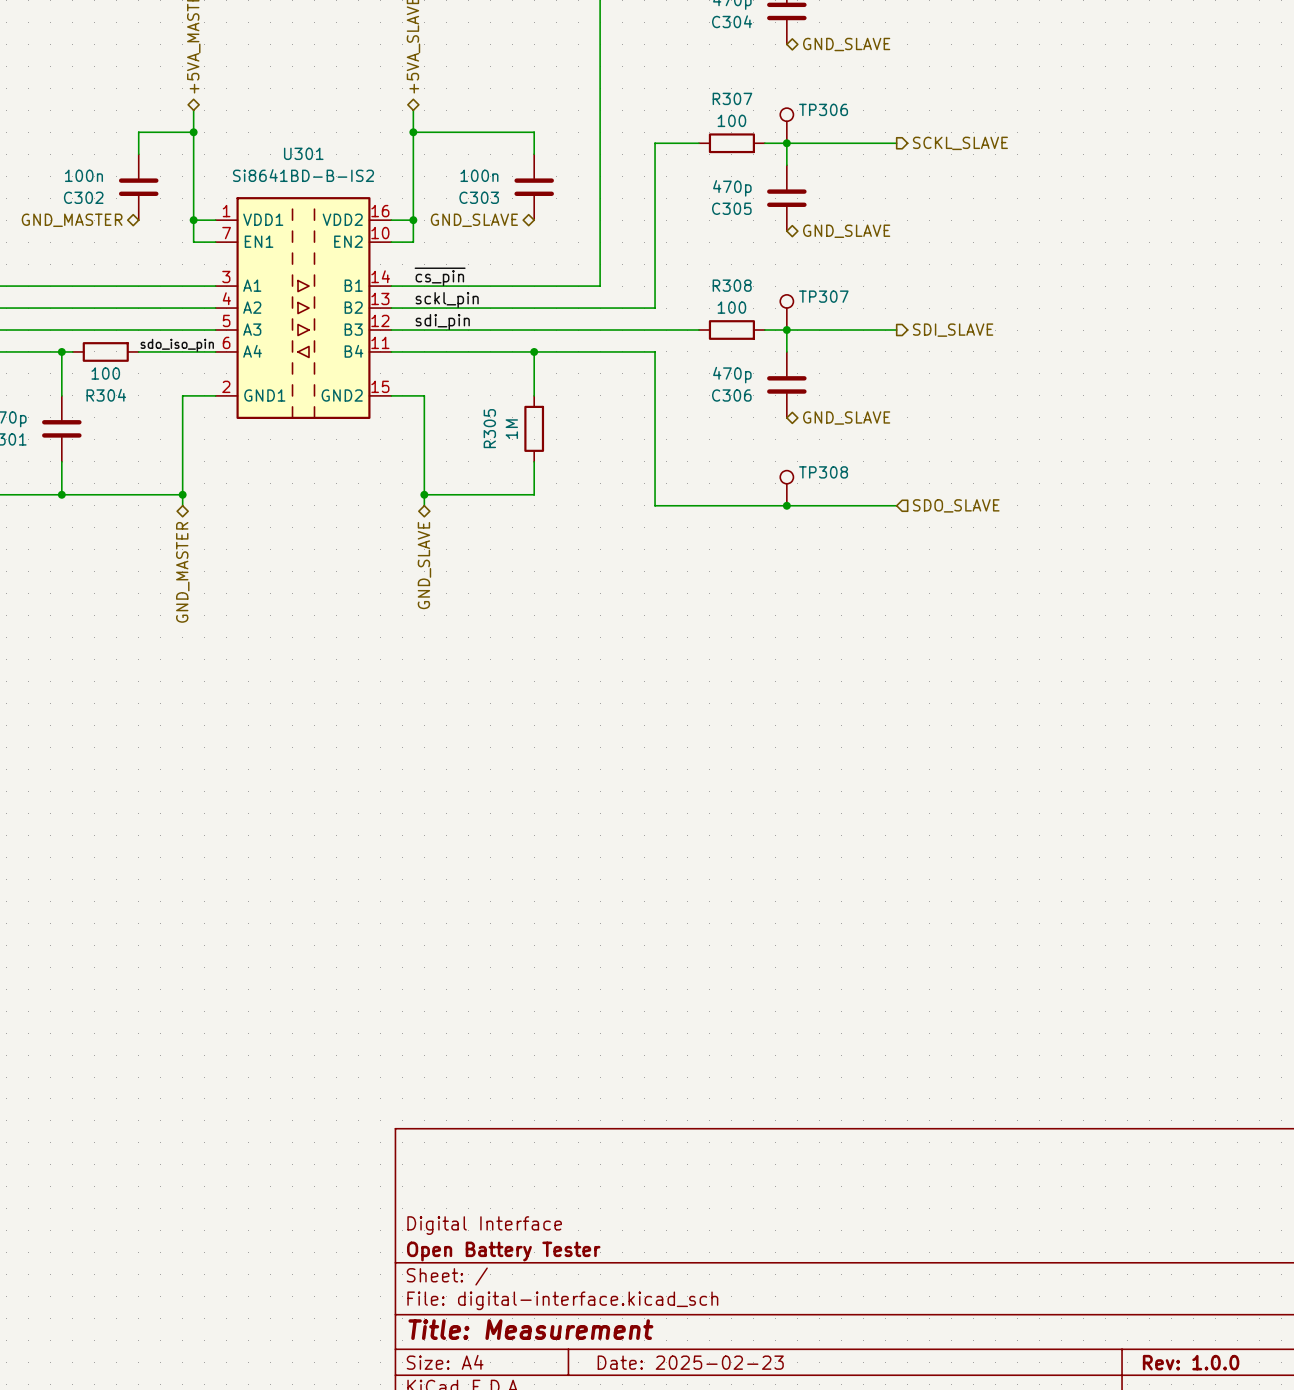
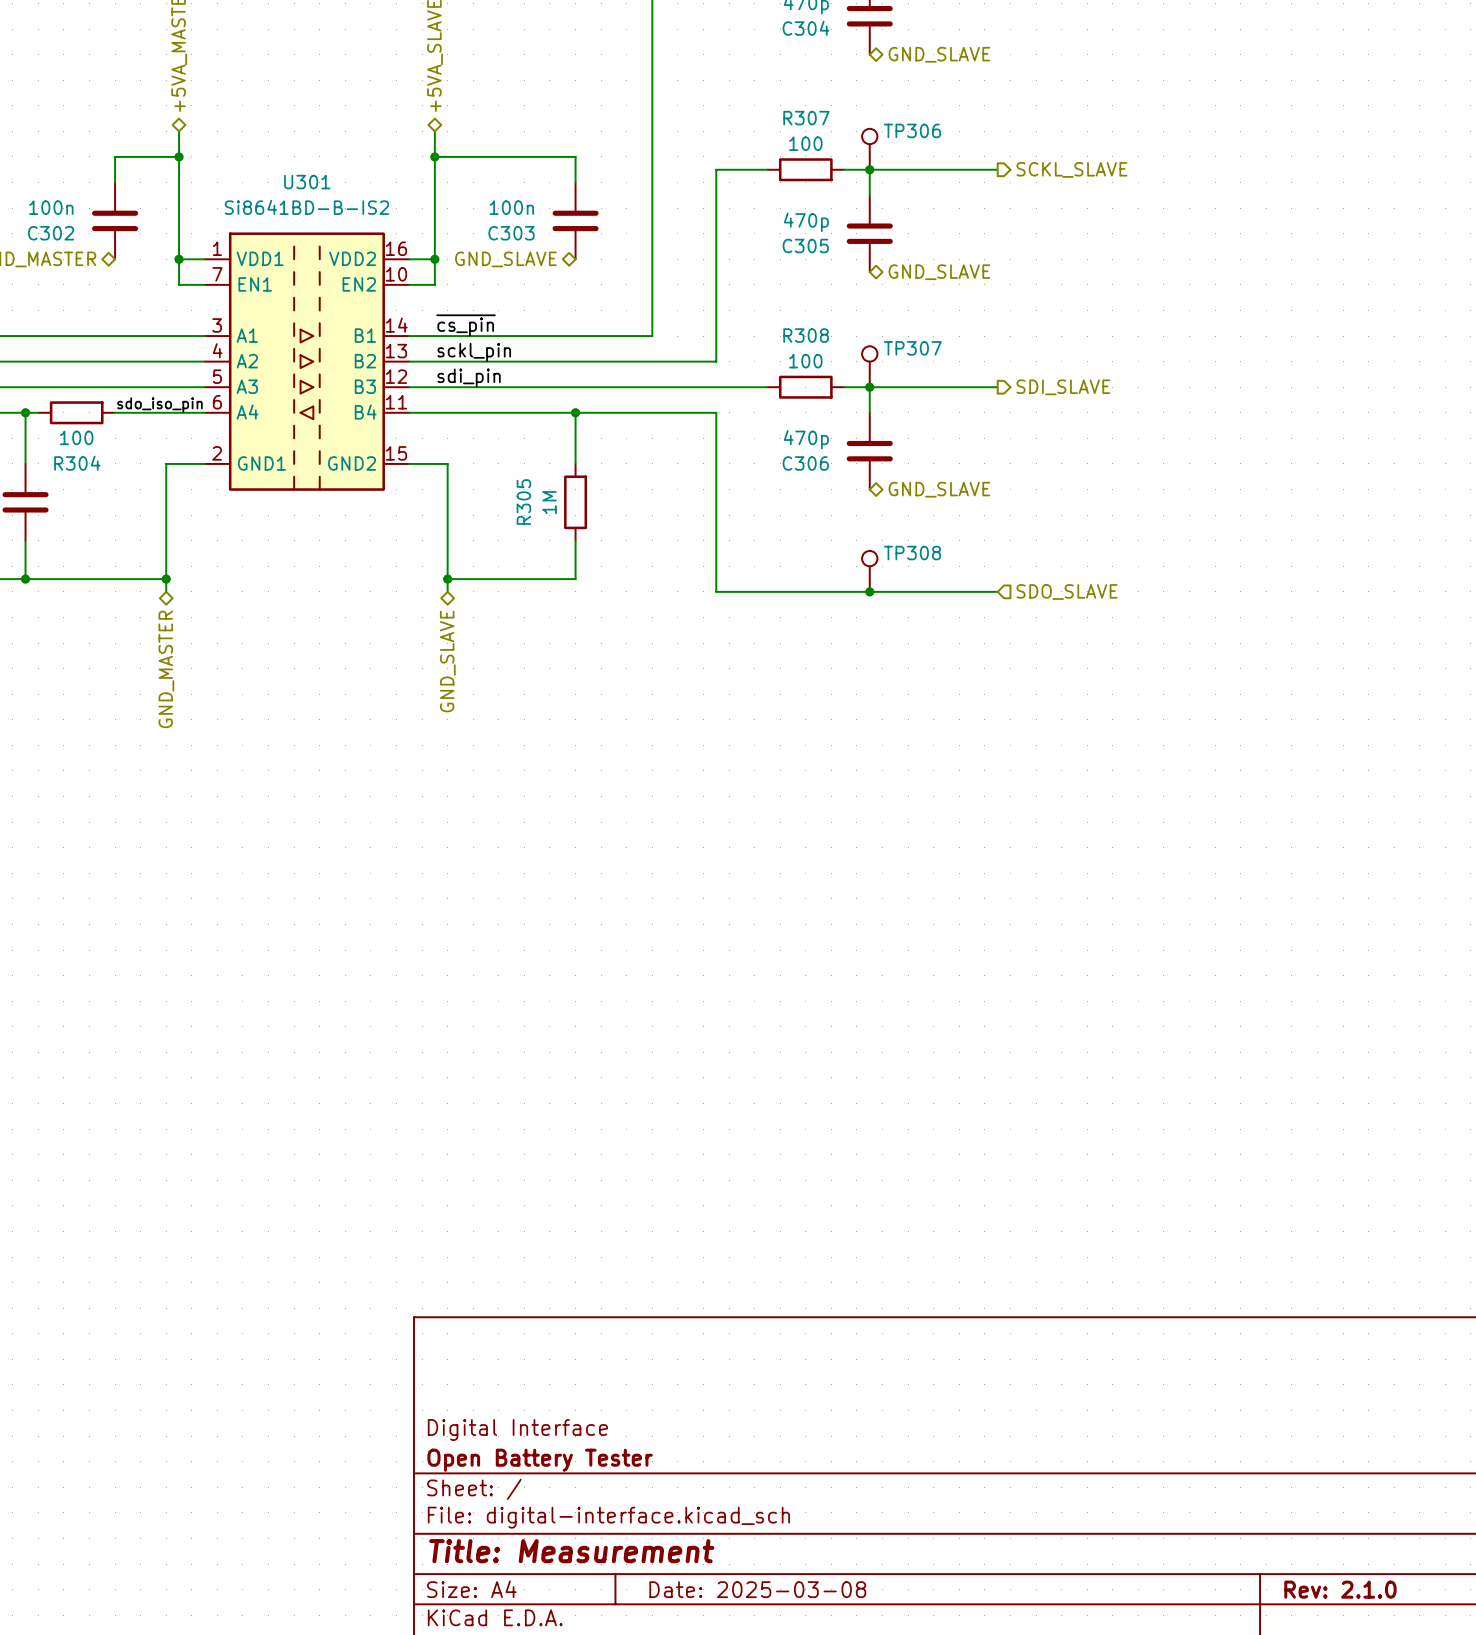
title block: Date: 2025-02-23 (690, 1362) -> Date: 2025-03-08 (757, 1589)
title block: Rev: 1.0.0 (1191, 1362) -> Rev: 2.1.0 (1340, 1589)

